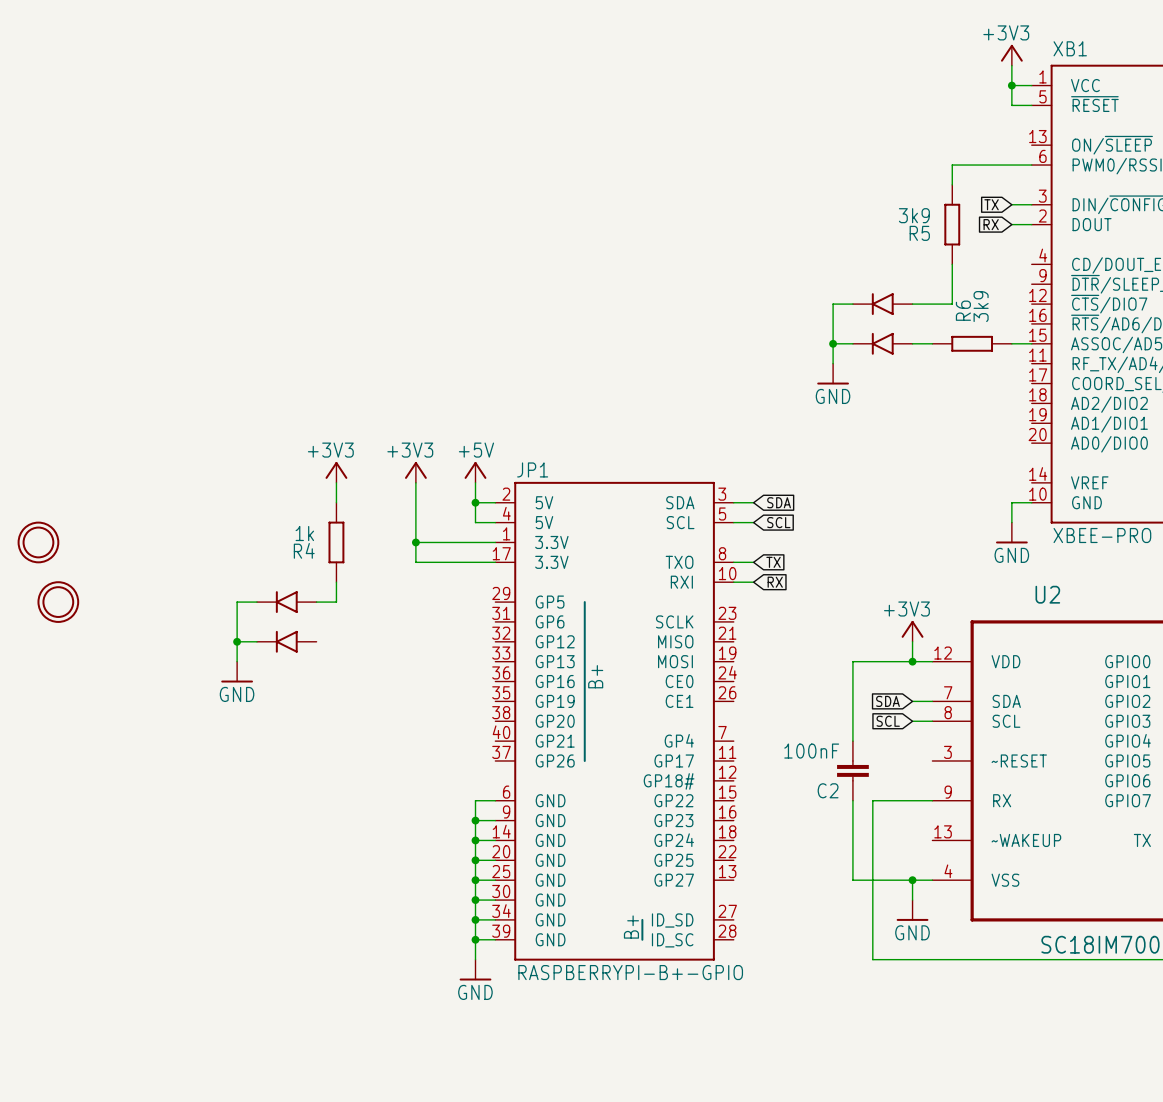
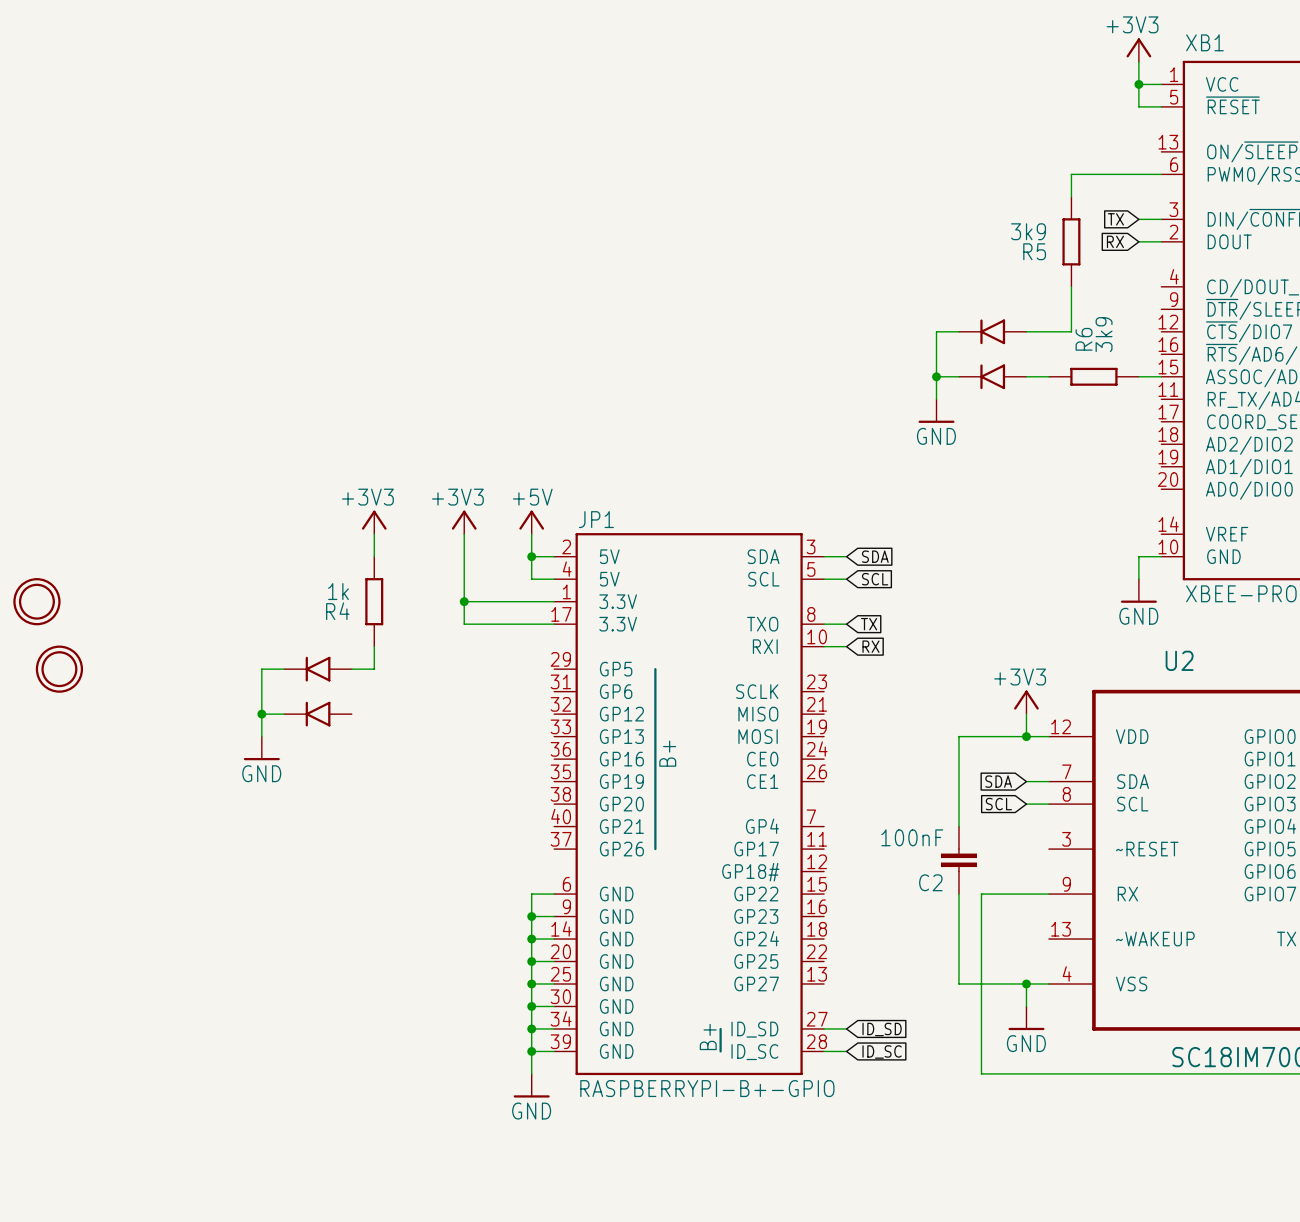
wire: none -> (824, 1028) (846, 1028)
global label: none -> ID_SD (882, 1029)
wire: none -> (824, 1051) (846, 1051)
global label: none -> ID_SC (882, 1052)

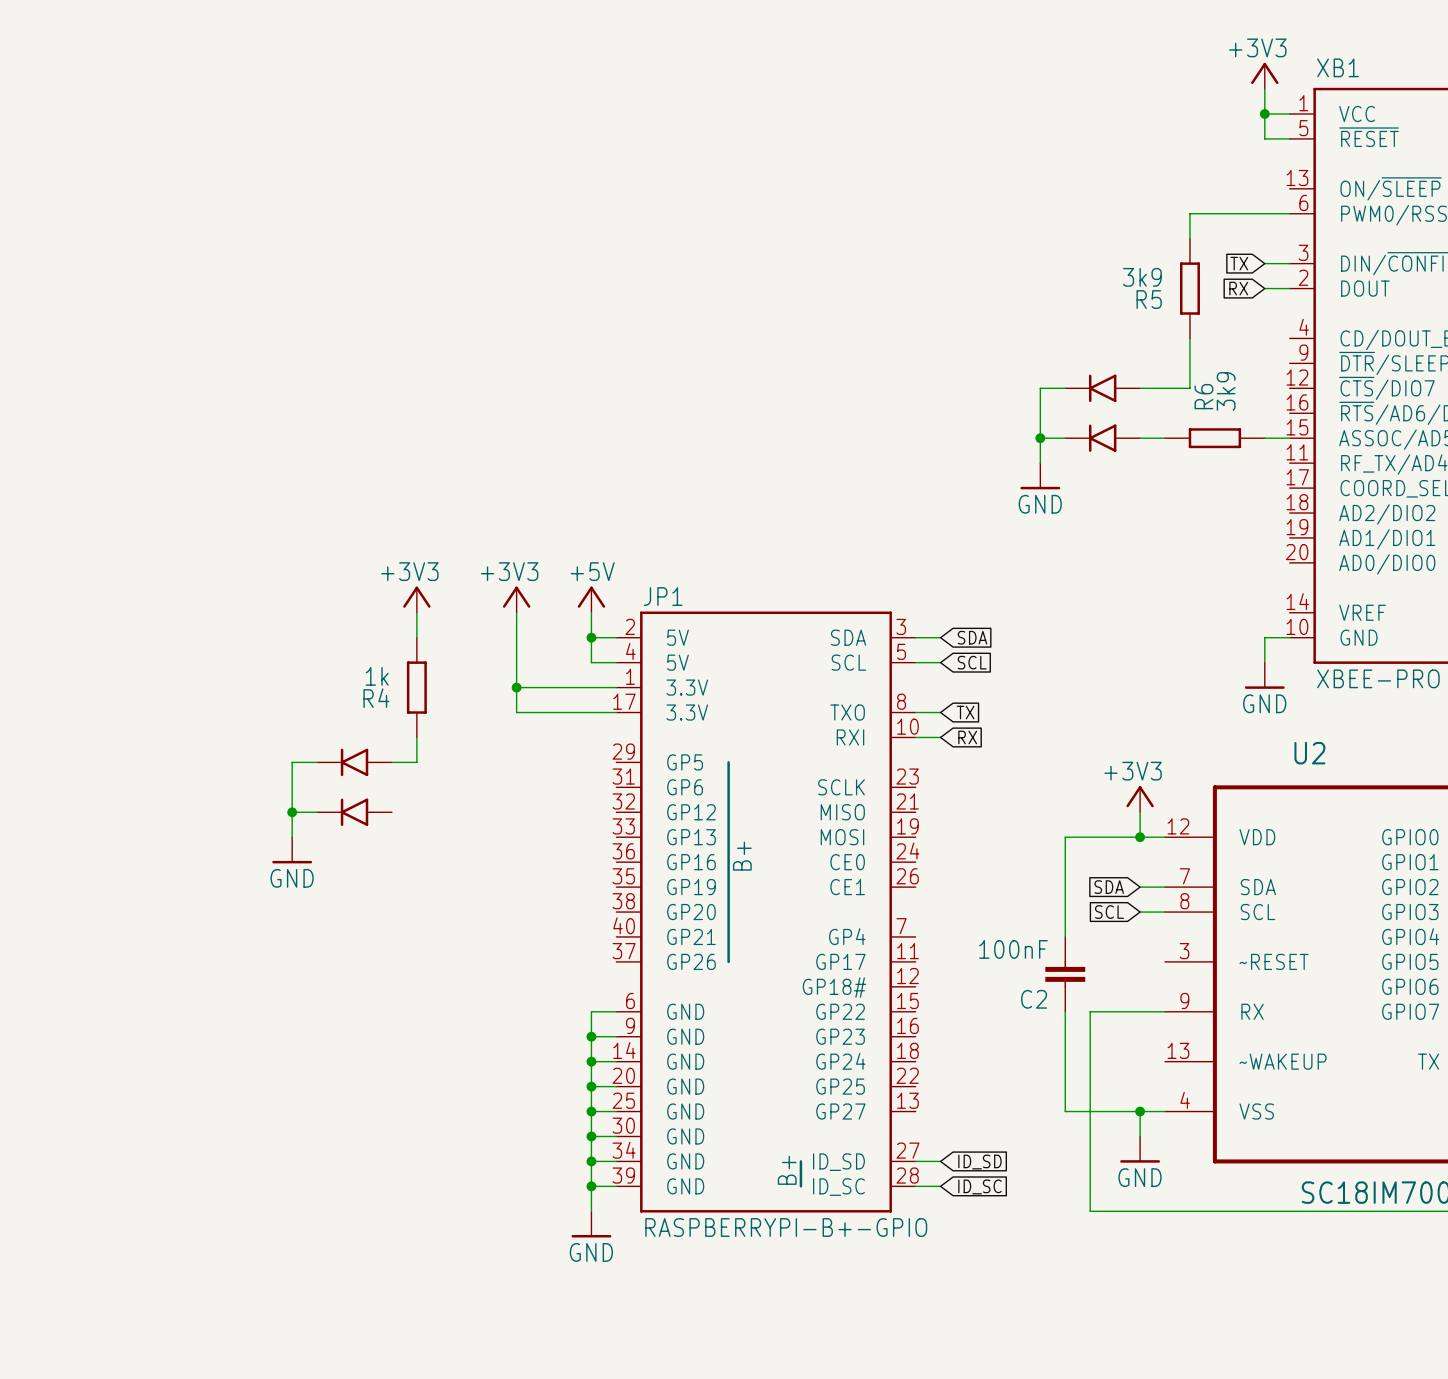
part: (36, 601) -> none
part: (59, 669) -> none

